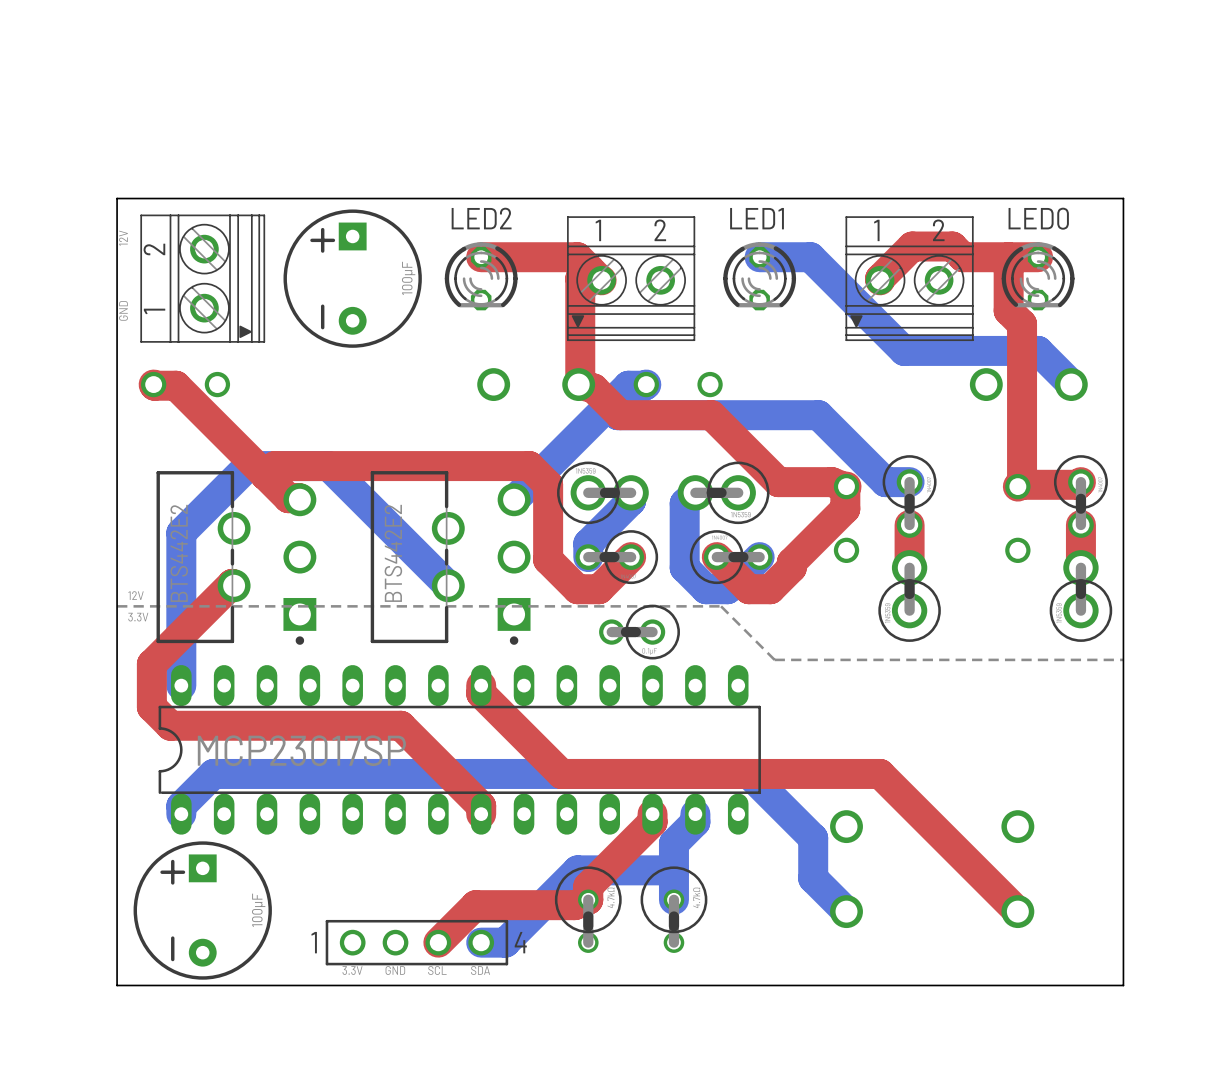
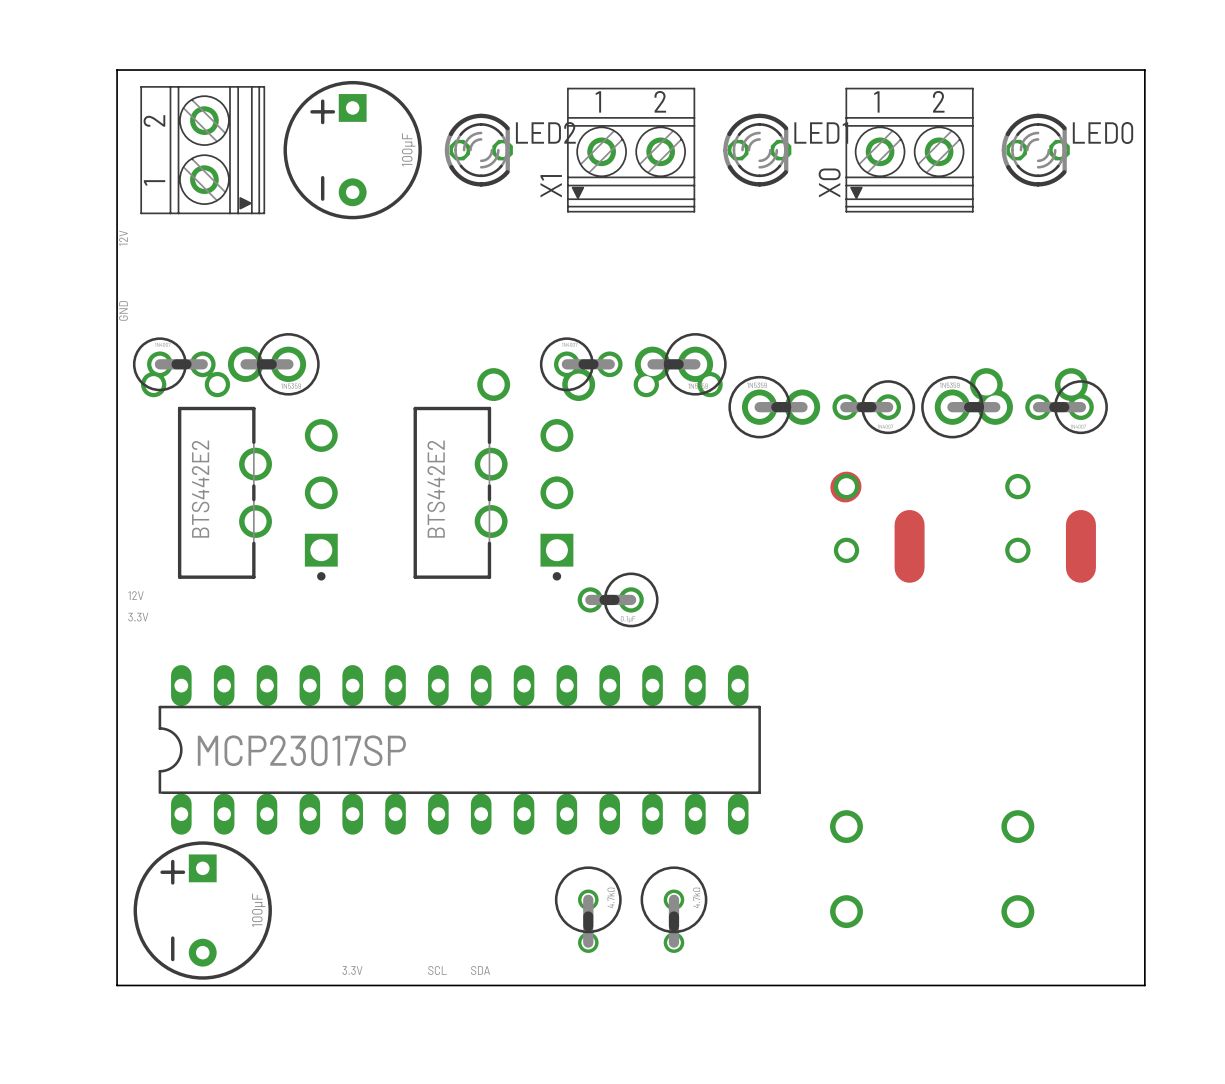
X1: none -> (631, 150)
X0: none -> (909, 150)
board edge: (117, 198) (1123, 198) (1123, 985) -> (117, 198) (117, 70) (1144, 70) (1144, 985) (1123, 985)
LED2 name position: LED2 (481, 218) -> LED2 (545, 132)
LED1 name position: LED1 (757, 218) -> LED1 (821, 132)
LED0 name position: LED0 (1038, 218) -> LED0 (1102, 133)
top track: (481, 257) (577, 257) (601, 280) -> none
bottom track: (759, 257) (810, 257) (904, 350) (1038, 350) (1071, 384) -> none
top track: (1008, 257) (1008, 310) (1022, 324) (1022, 484) -> none
top track: (1038, 257) (963, 257) (952, 246) (912, 246) (880, 280) -> none
top track: (589, 269) (580, 278) (580, 383) (578, 384) (593, 388) (620, 415) (711, 415) (778, 482) (831, 482) (845, 487) (845, 508) (791, 562) (791, 567) (770, 589) (748, 589) (716, 557) -> none
LED2 rotation: 0° (481, 276) -> 90° counterclockwise (478, 150)
LED2 position: (481, 276) -> (478, 150)
LED1 rotation: 0° (759, 276) -> 90° counterclockwise (757, 150)
LED1 position: (759, 276) -> (757, 150)
LED0 rotation: 0° (1038, 276) -> 90° counterclockwise (1035, 150)
LED0 position: (1038, 276) -> (1035, 150)
part position: (202, 278) -> (202, 150)
part position: (352, 278) -> (352, 150)
part: (631, 278) -> none
part: (909, 278) -> none
part: none -> (174, 364)
part: none -> (273, 364)
part: none -> (581, 364)
top track: (153, 384) (175, 385) (288, 498) (299, 499) -> none
bottom track: (646, 384) (628, 385) (514, 499) -> none
bottom track: (608, 405) (617, 415) (818, 415) (885, 482) (909, 482) -> none
part: none -> (774, 407)
part: none -> (873, 407)
part: none -> (967, 407)
part: none -> (1066, 407)
top track: (265, 475) (275, 466) (529, 466) (548, 484) (548, 559) (577, 589) (599, 589) (631, 557) -> none
top track: (1080, 482) (1078, 484) (1019, 484) (1017, 486) -> none
part: (602, 492) -> none
bottom track: (631, 492) (631, 500) (588, 543) (588, 557) -> none
bottom track: (695, 492) (684, 503) (684, 567) (706, 589) (727, 589) (759, 557) -> none
part position: (723, 492) -> (680, 364)
part: (909, 496) -> none
part: (1080, 496) -> none
part position: (236, 557) -> (257, 493)
part position: (450, 557) -> (493, 493)
part: (616, 557) -> none
part: (731, 557) -> none
top track: (234, 585) (232, 583) (151, 664) (151, 707) (170, 725) (400, 725) (481, 806) (481, 814) -> none
bottom track: (448, 585) (328, 466) (248, 466) (181, 533) (181, 685) -> none
part: (909, 596) -> none
part: (1080, 596) -> none
line: (117, 606) (721, 606) (774, 659) (1123, 659) -> none
part position: (639, 632) -> (618, 599)
top track: (481, 685) (481, 693) (561, 773) (880, 773) (1017, 911) -> none
bottom track: (181, 814) (181, 806) (213, 773) (748, 773) (813, 838) (813, 878) (846, 911) -> none
top track: (652, 814) (652, 822) (588, 886) (588, 899) (574, 905) (475, 905) (438, 942) -> none
bottom track: (695, 814) (695, 822) (673, 843) (673, 899) -> none
bottom track: (673, 870) (577, 870) (505, 942) (481, 942) -> none
part: (416, 942) -> none
text: GND (395, 970) -> none

